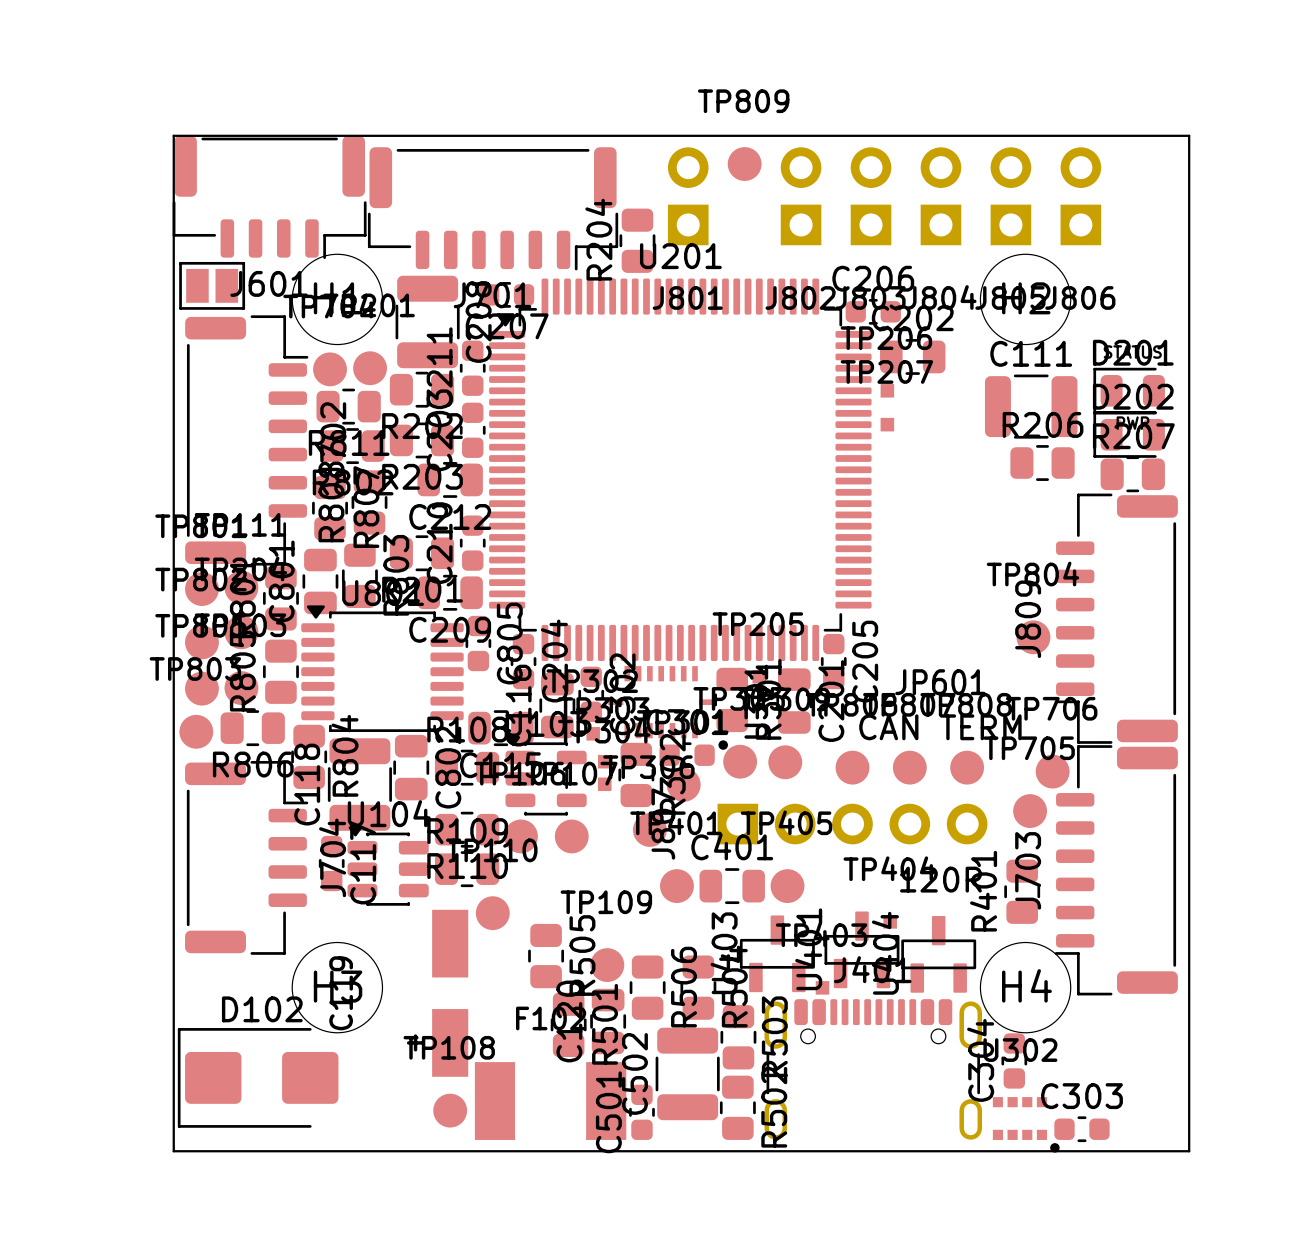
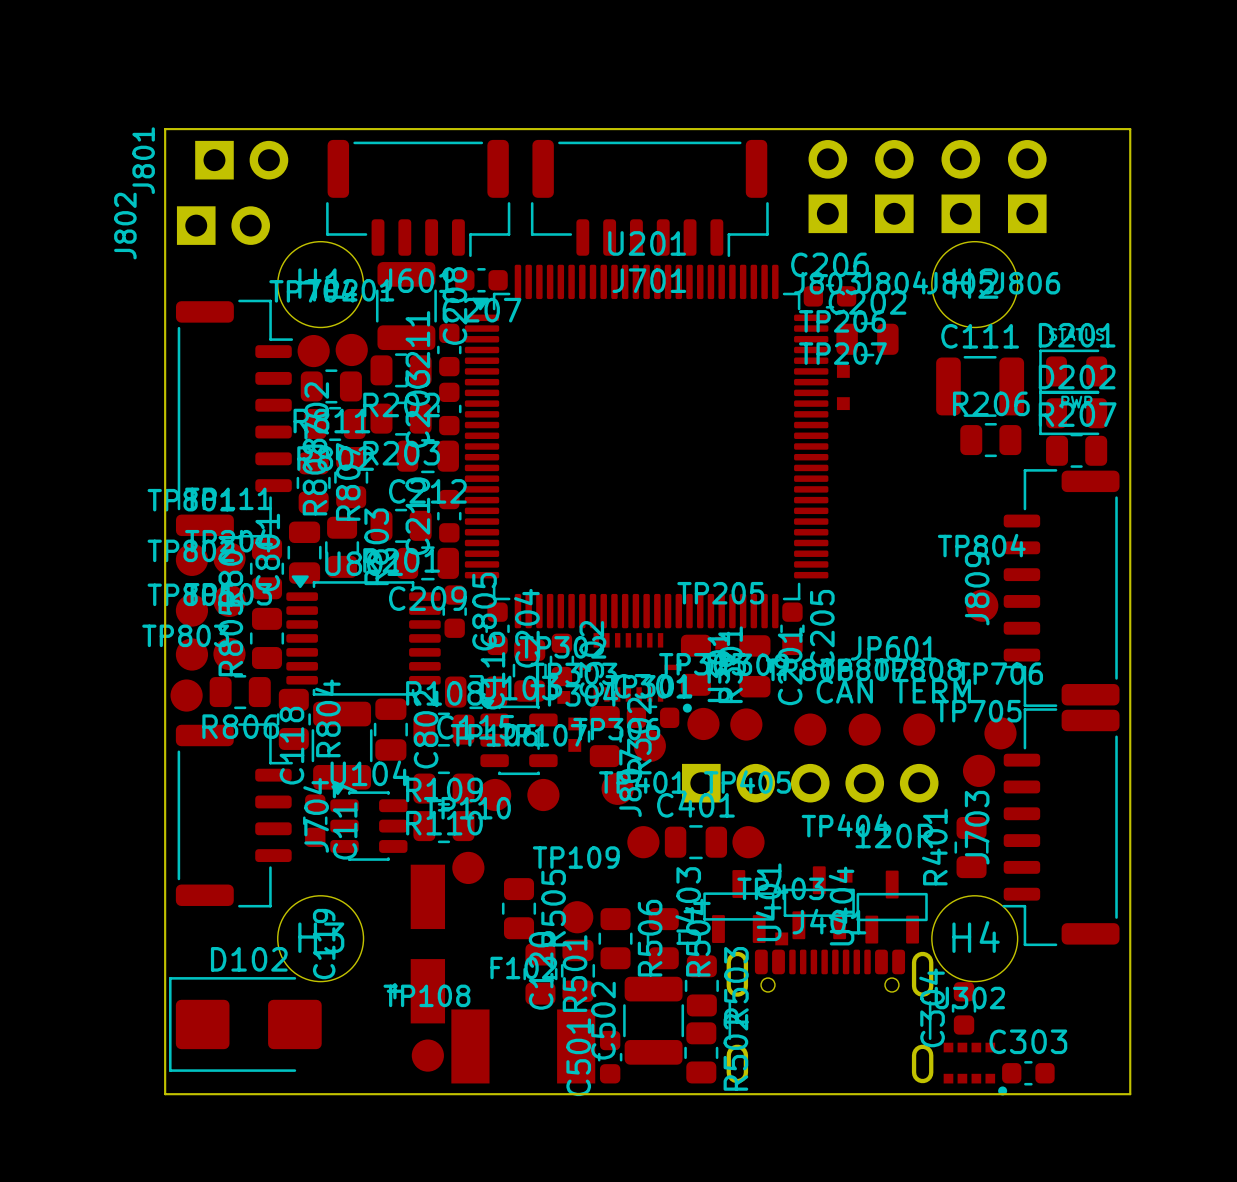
TP809: (744, 164) -> none
J801 rotation: 0° (688, 196) -> 90° clockwise (241, 160)
J801 position: (688, 196) -> (241, 160)
J802 rotation: 0° (801, 196) -> 90° clockwise (223, 225)
J802 position: (801, 196) -> (223, 225)
J601 position: (269, 197) -> (418, 198)
J701 position: (493, 208) -> (649, 198)
R204: (637, 240) -> none
part: (212, 285) -> none

